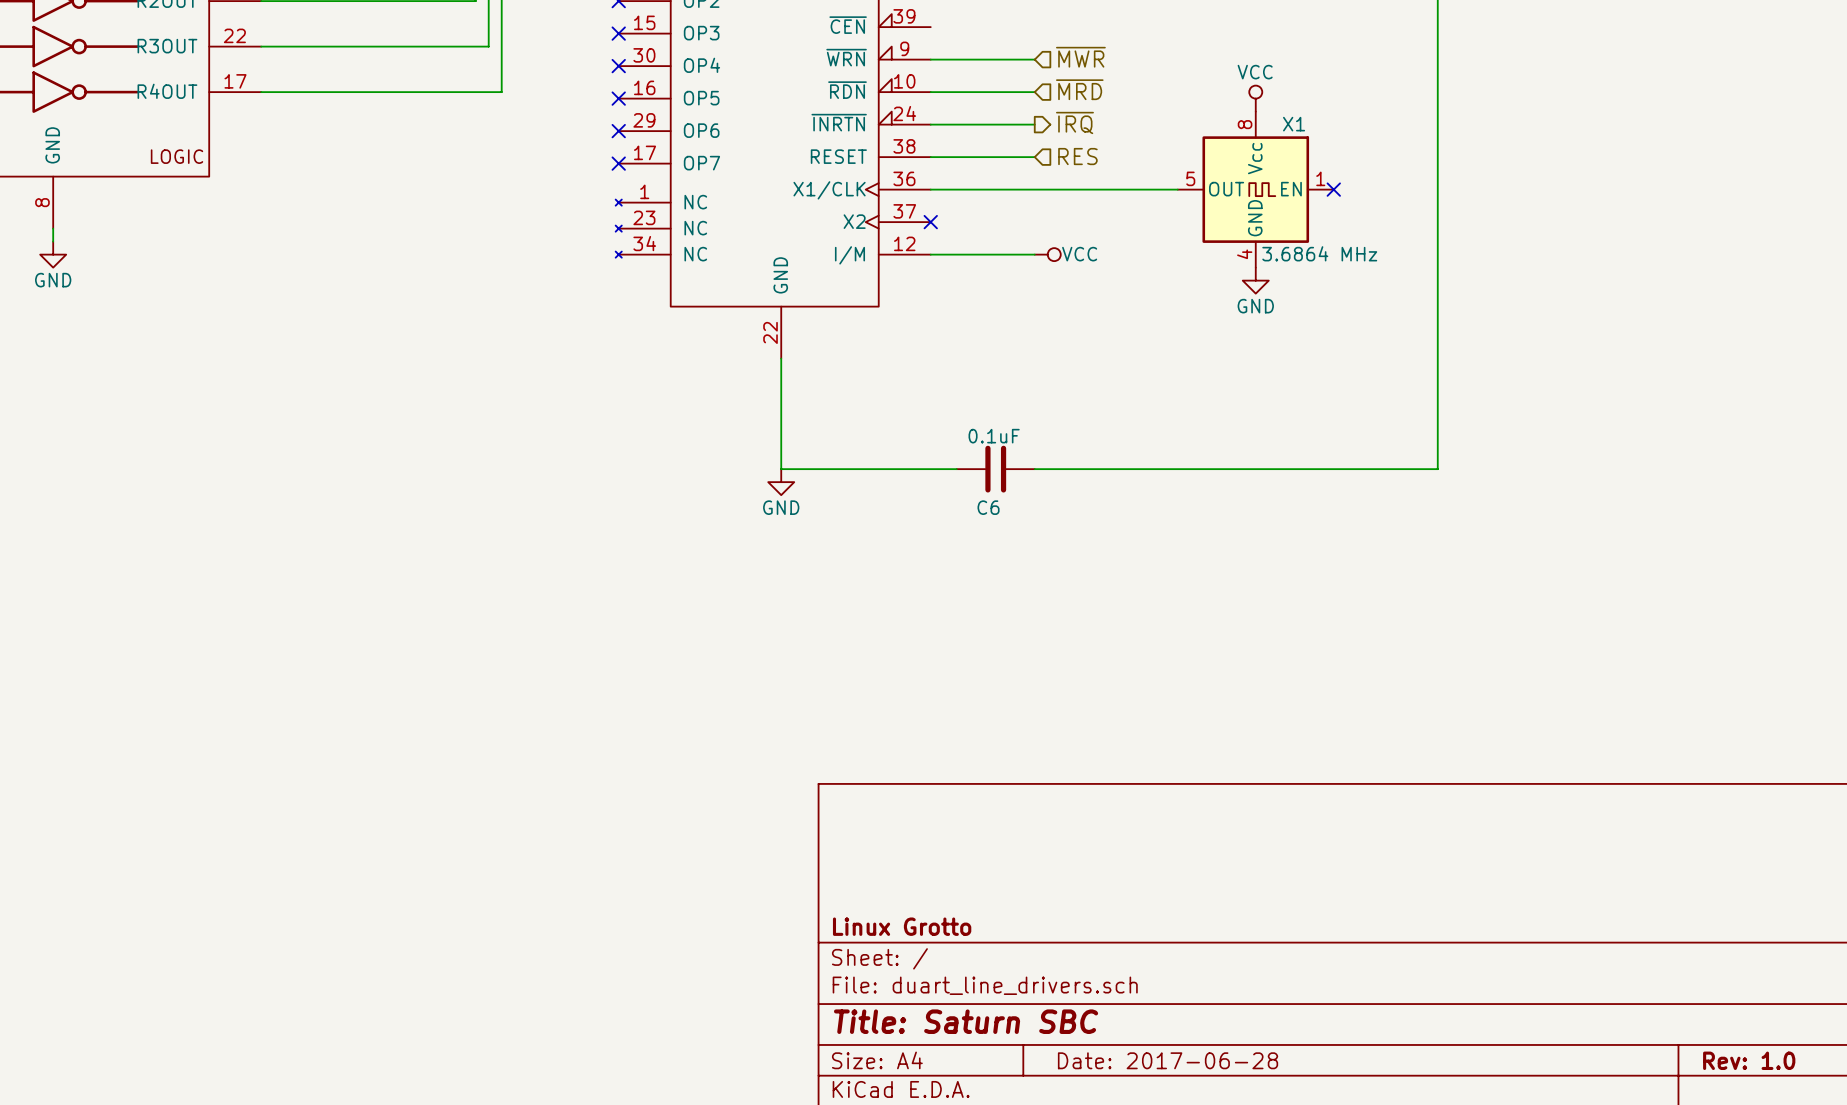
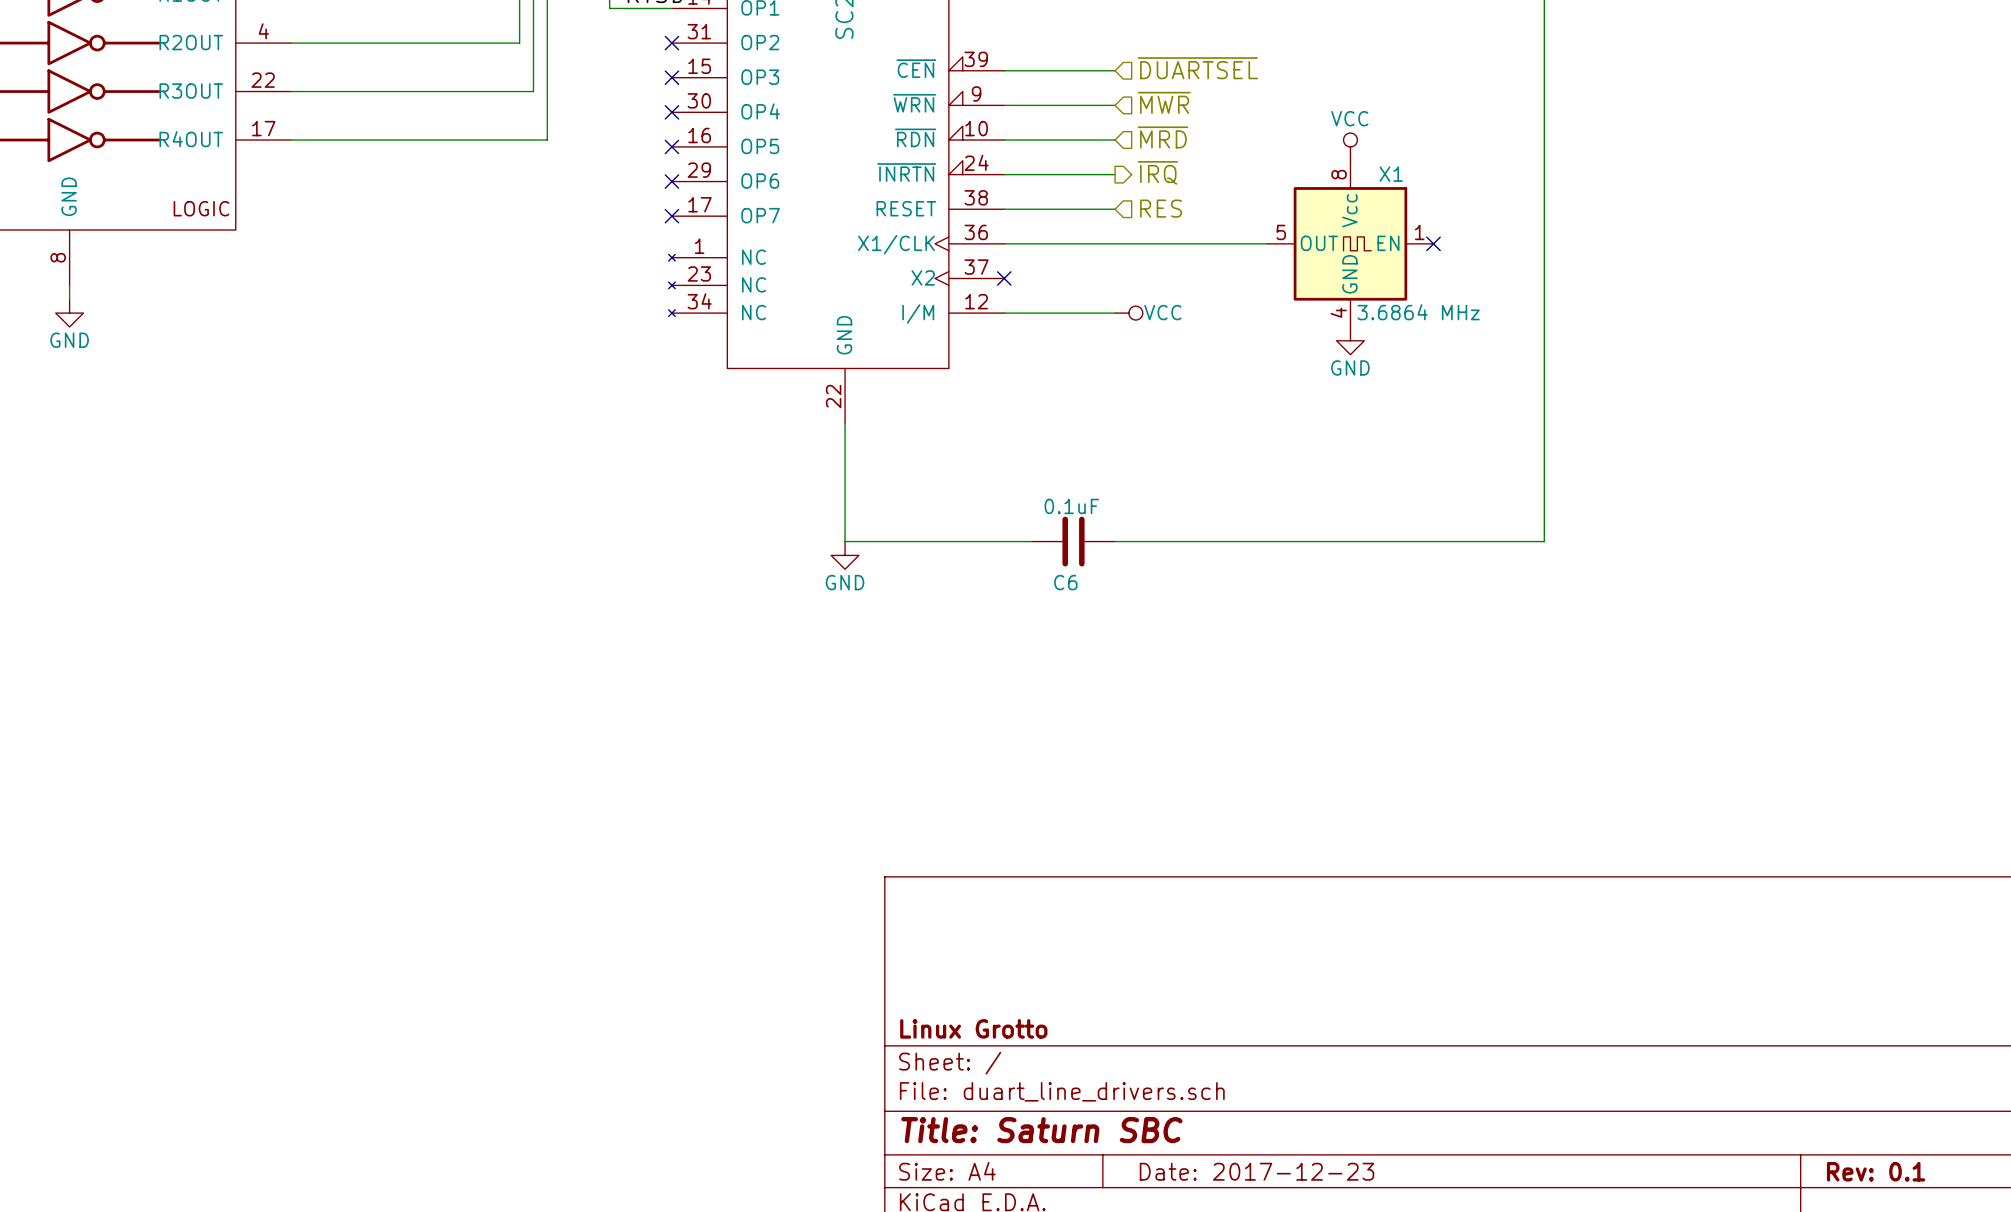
hierarchical label: none -> ~{DUARTSEL} (1197, 68)
wire: none -> (1004, 70) (1115, 70)
title block: Date: 2017-06-28 (1168, 1060) -> Date: 2017-12-23 (1257, 1171)
title block: Rev: 1.0 (1749, 1060) -> Rev: 0.1 (1876, 1171)

